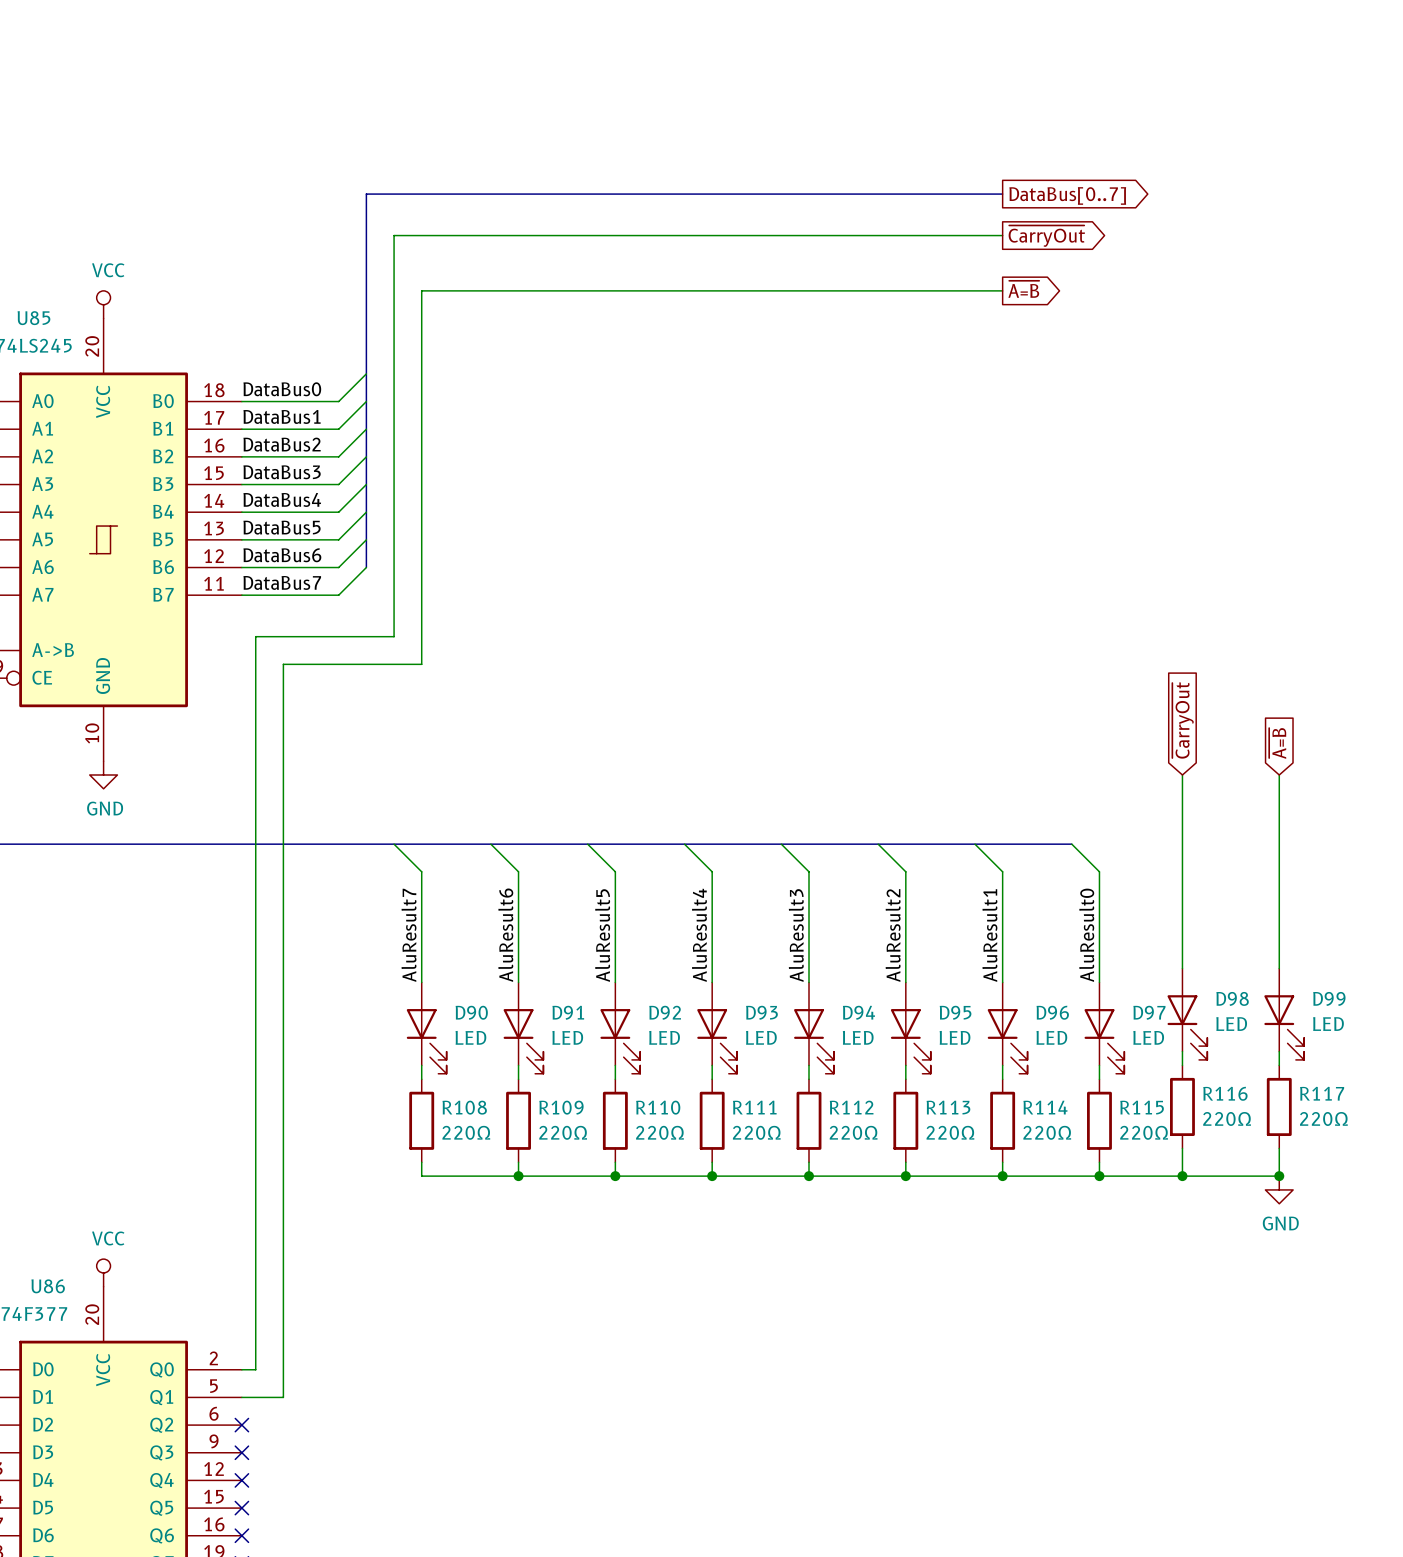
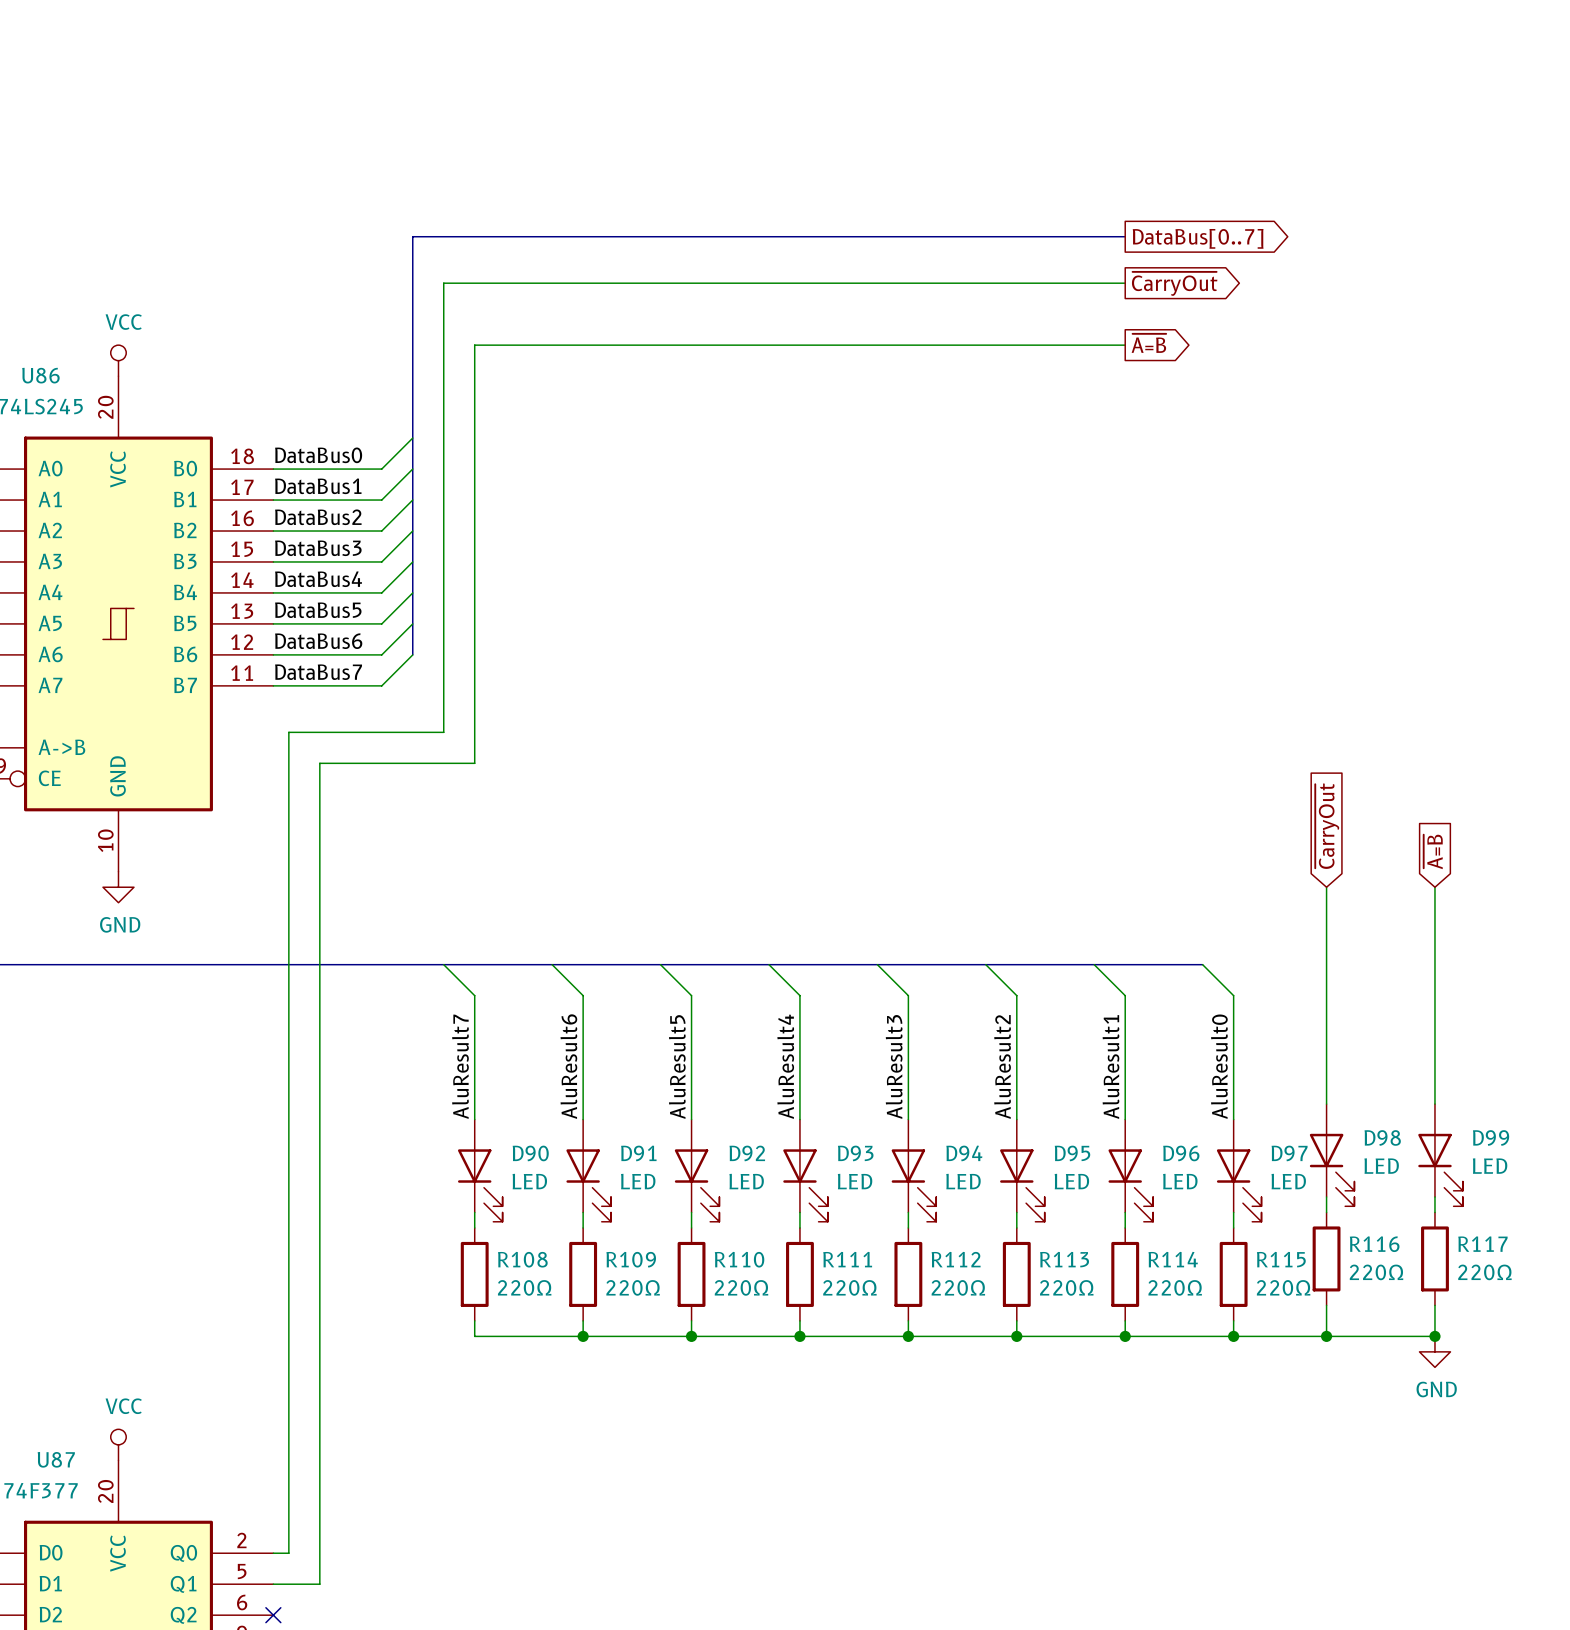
U85 name: U85 (33, 318) -> U86 (40, 375)
U86 name: U86 (48, 1286) -> U87 (56, 1459)

